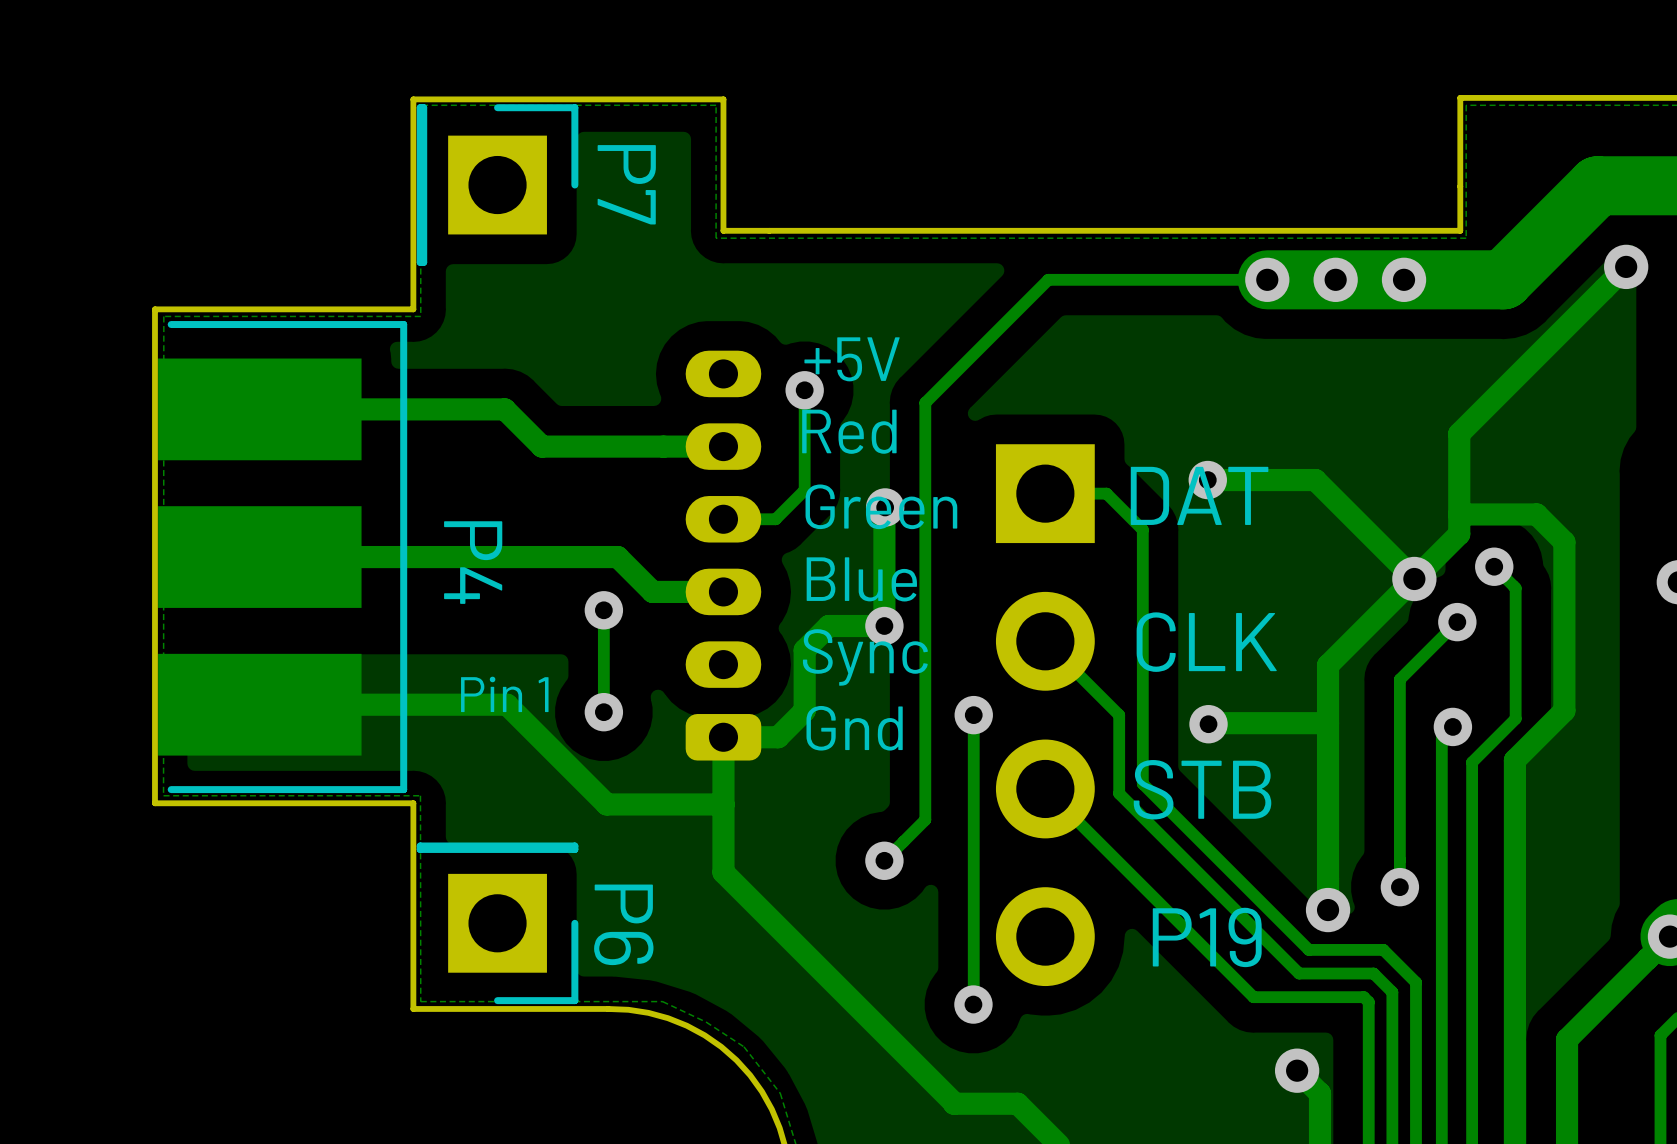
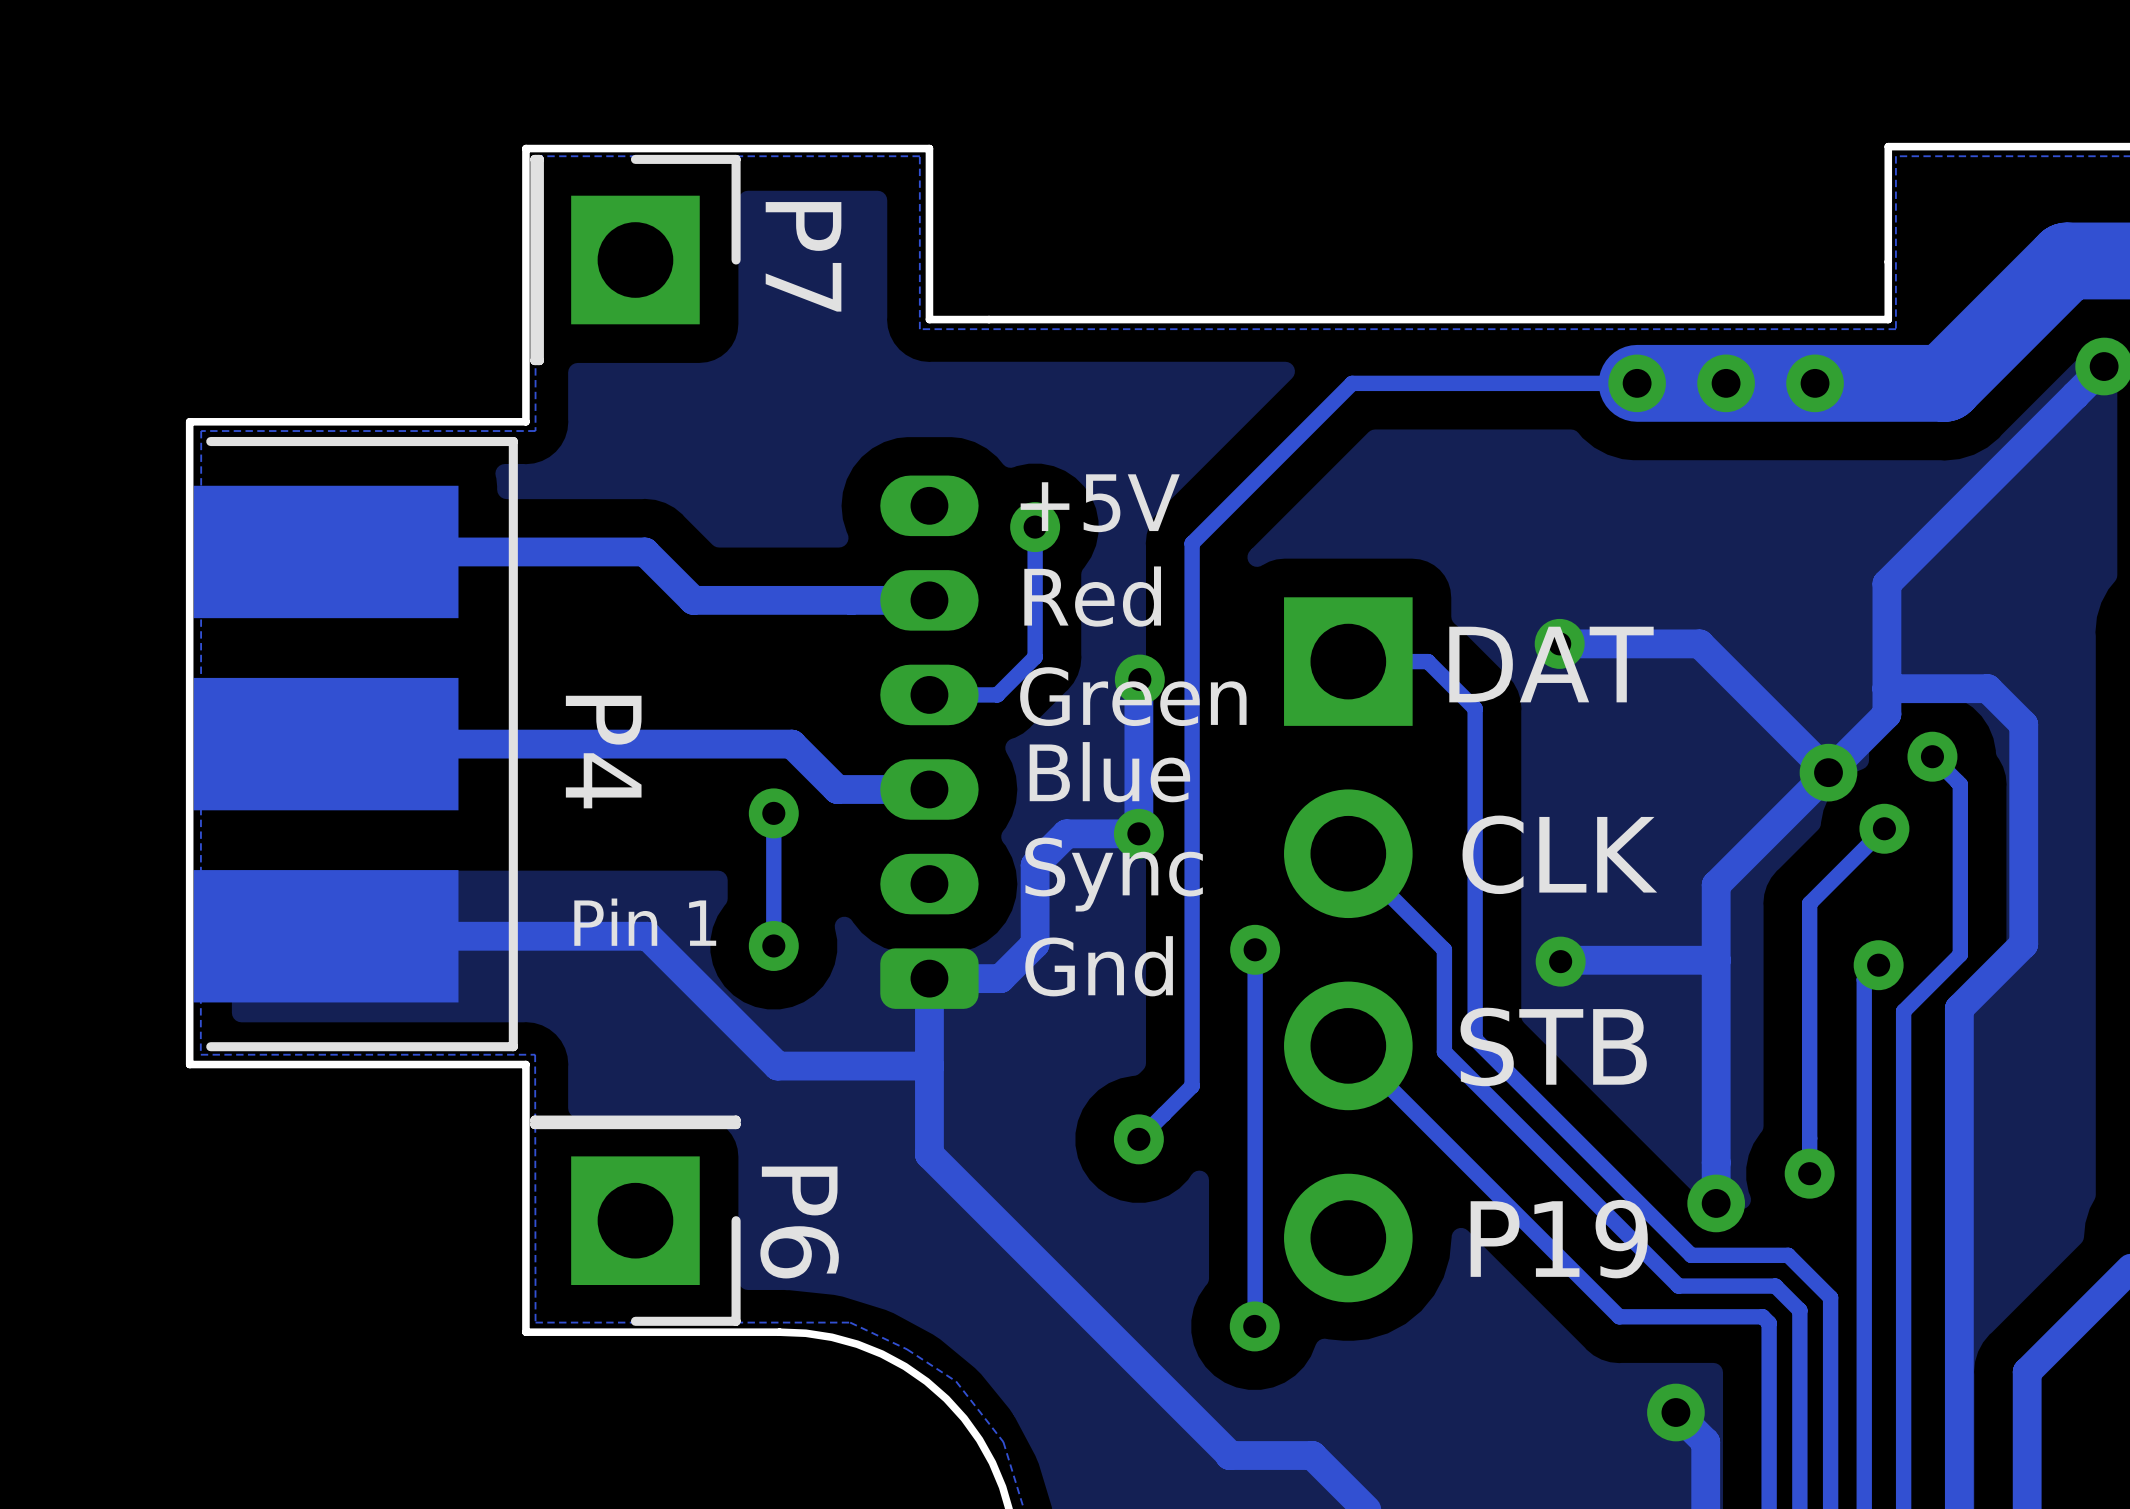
text position: +5V (852, 359) -> +5V (1100, 503)
text position: Red (849, 431) -> Red (1092, 596)
text position: Green (881, 506) -> Green (1133, 696)

